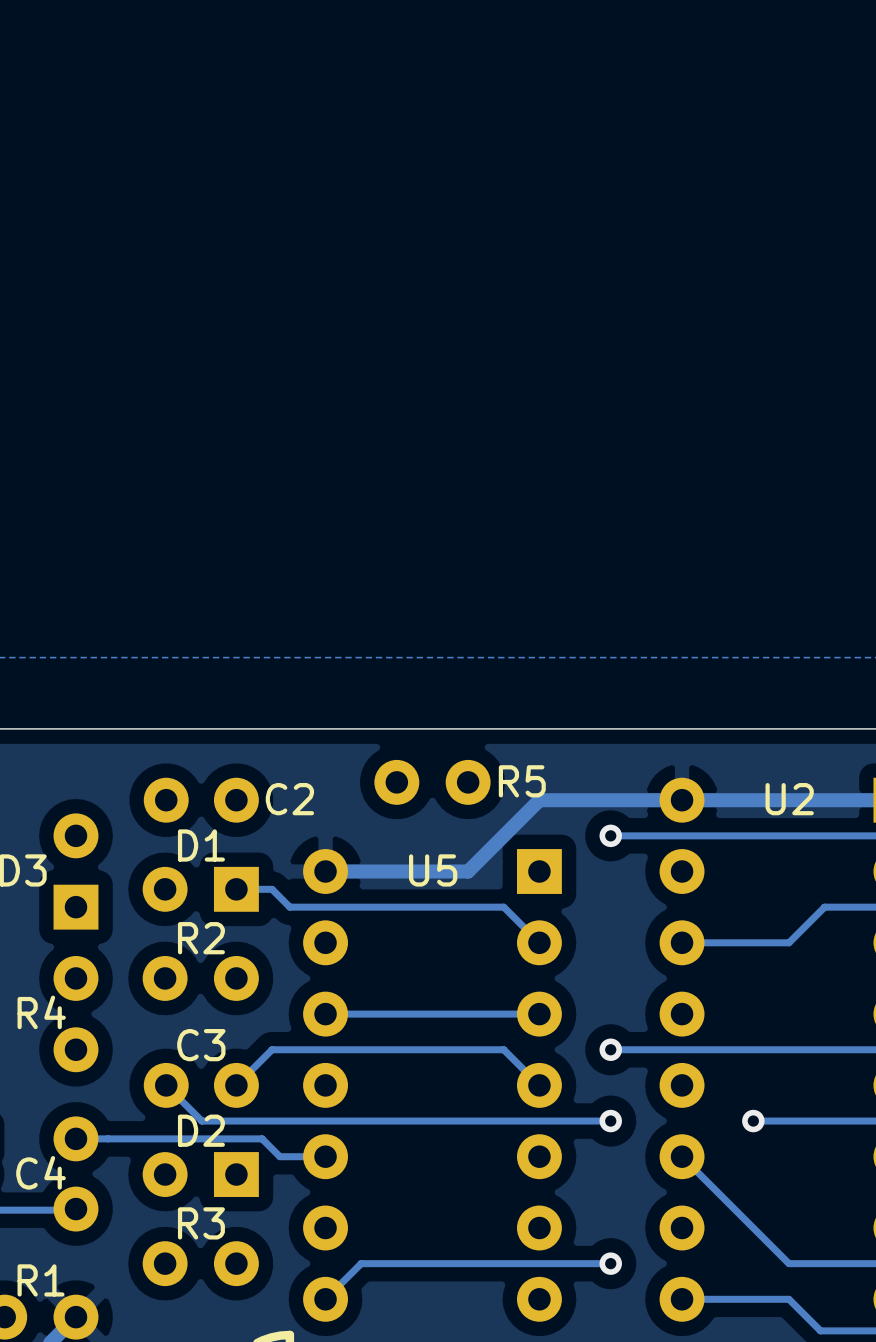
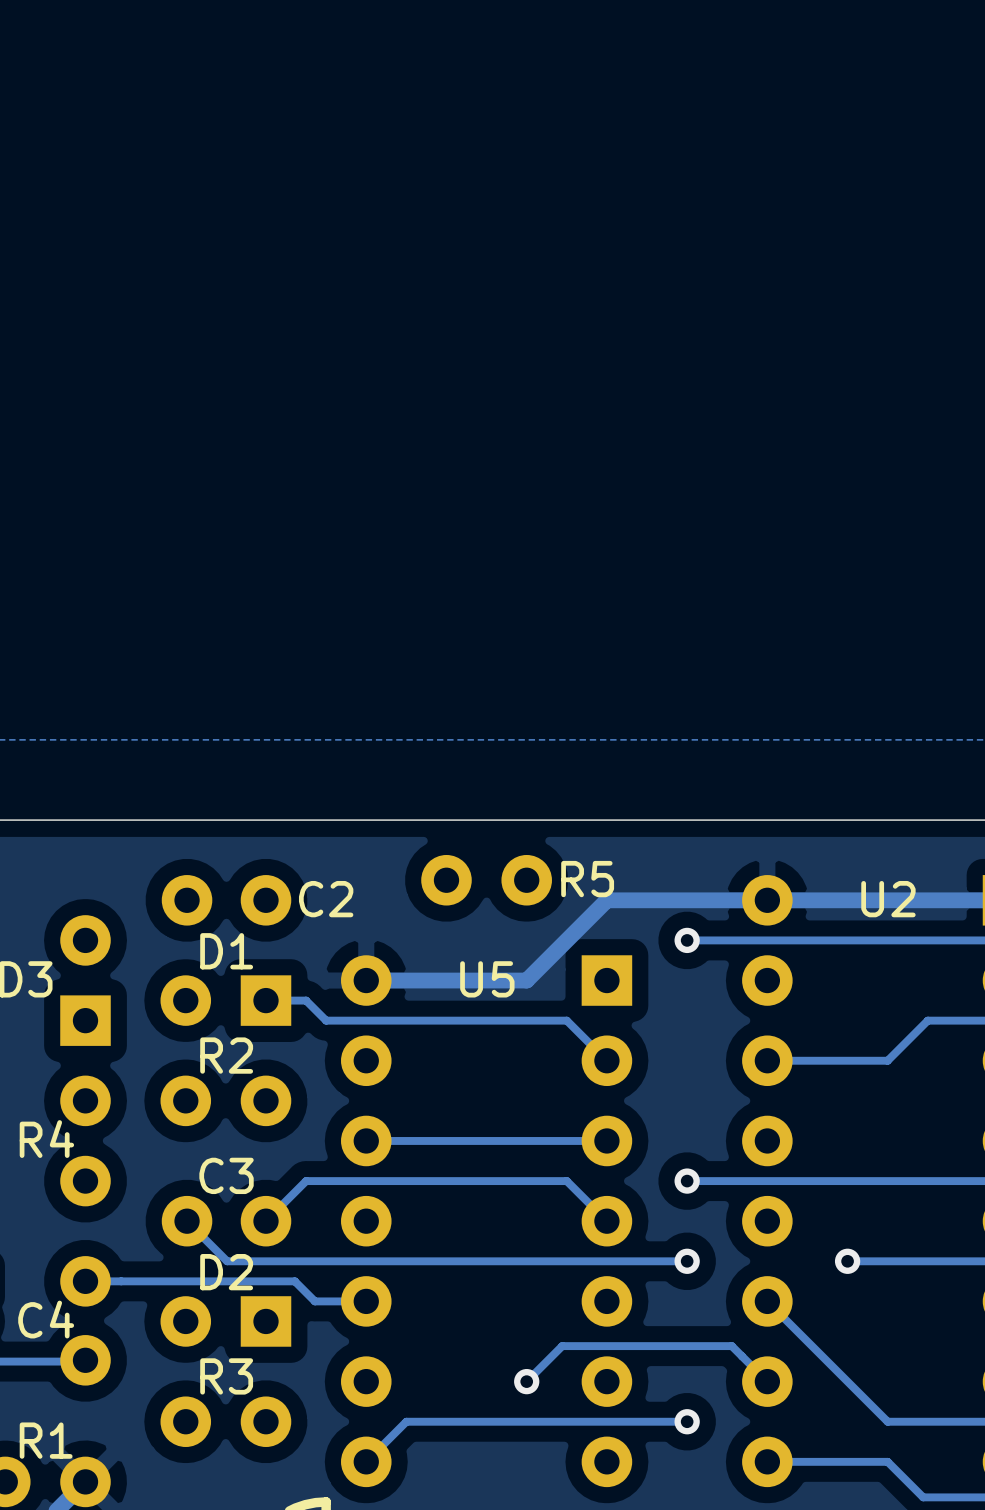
via: none -> (526, 1381)
track: none -> (767, 1381) (731, 1346) (562, 1346) (526, 1381)

